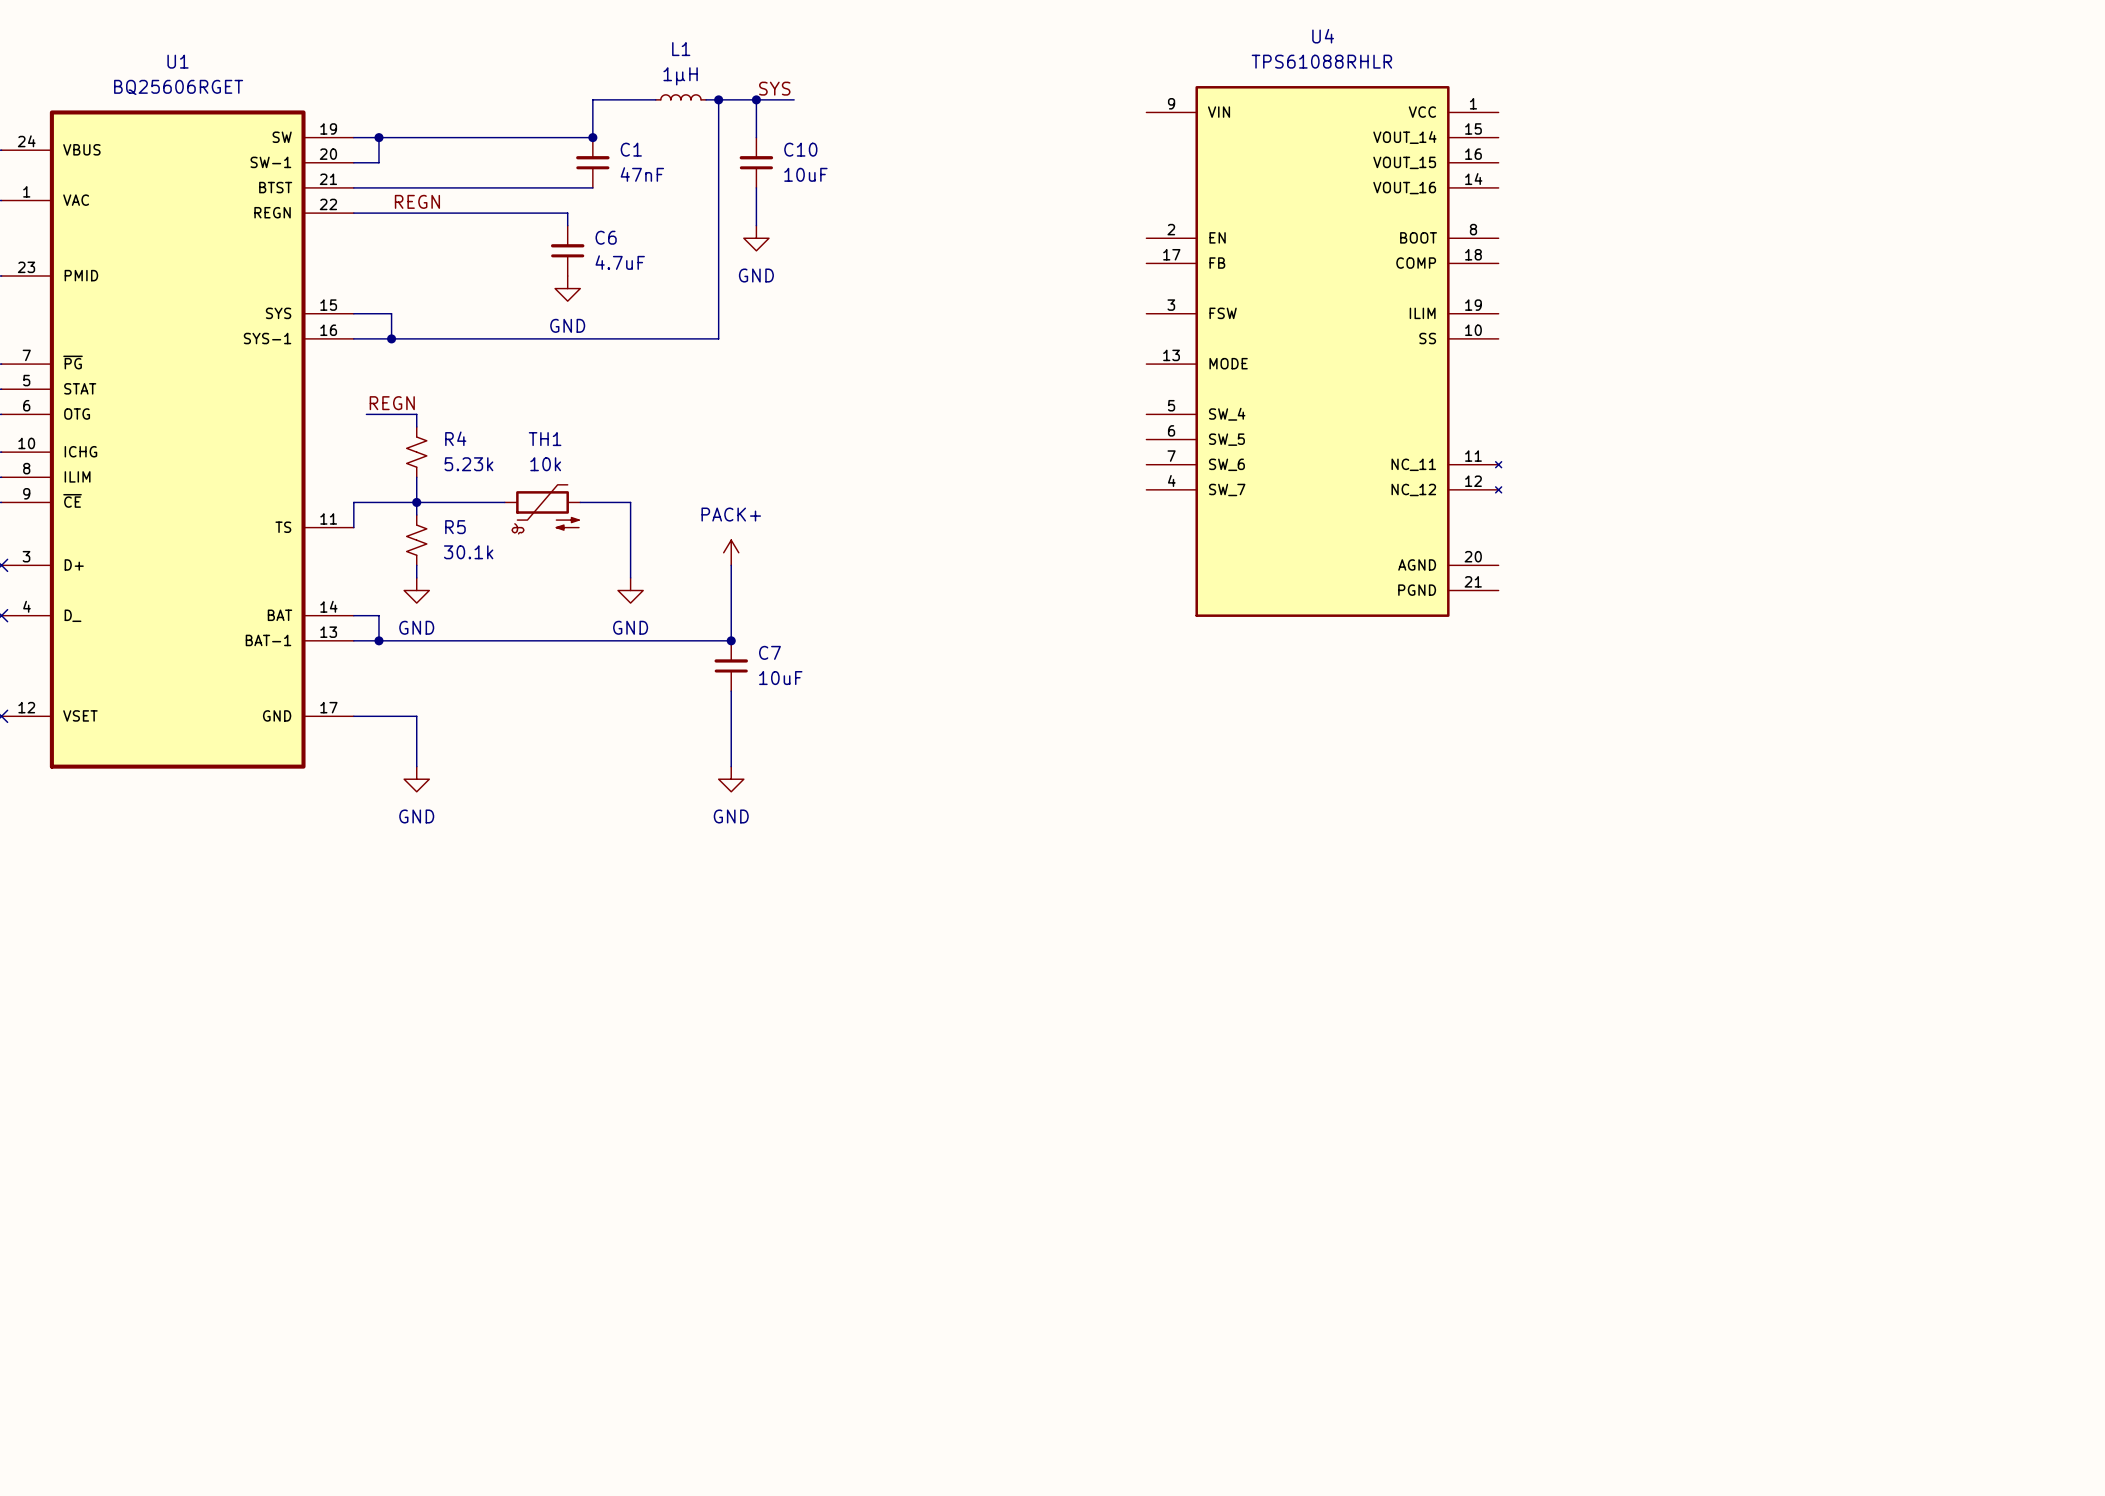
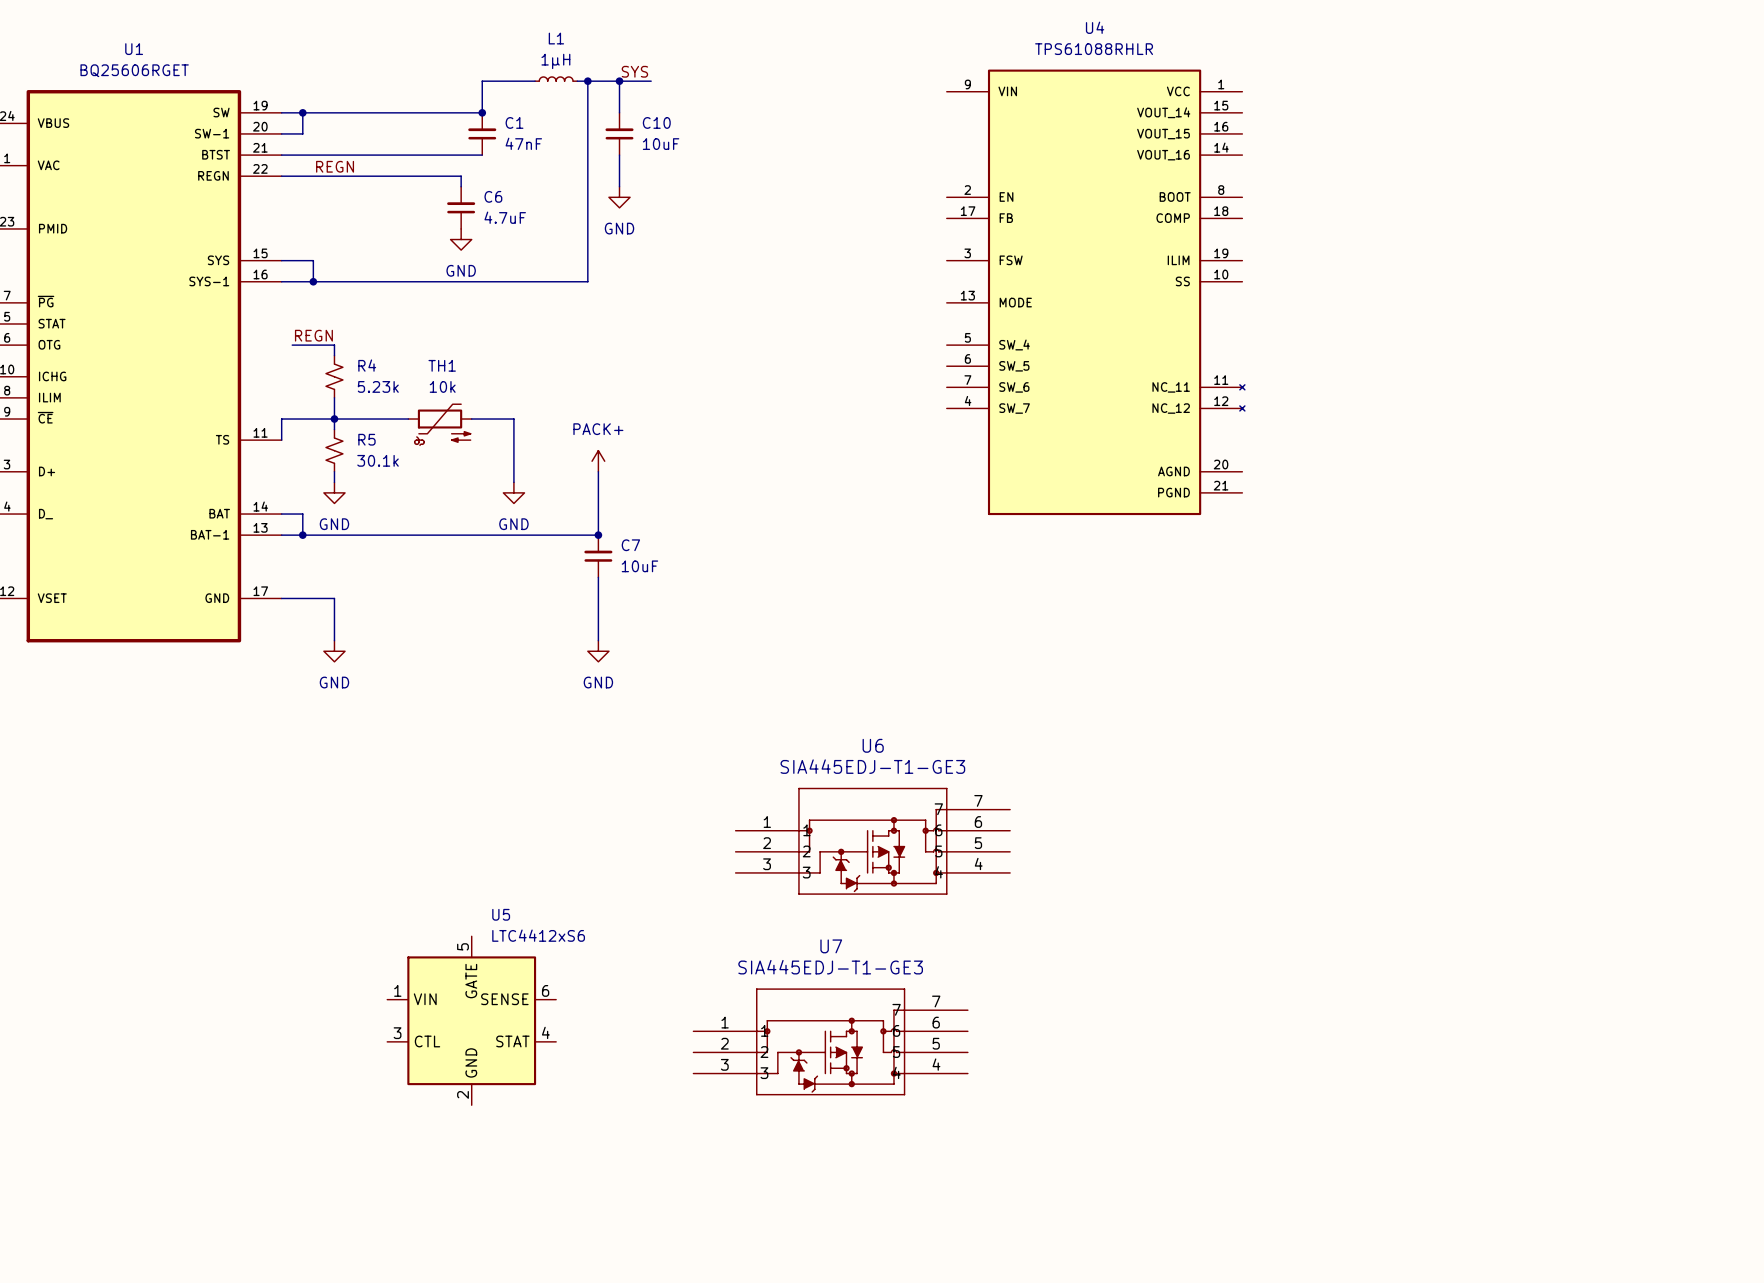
U6: none -> SIA445EDJ-T1-GE3 (872, 841)
U5: none -> LTC4412xS6 (471, 1020)
U7: none -> SIA445EDJ-T1-GE3 (830, 1041)

